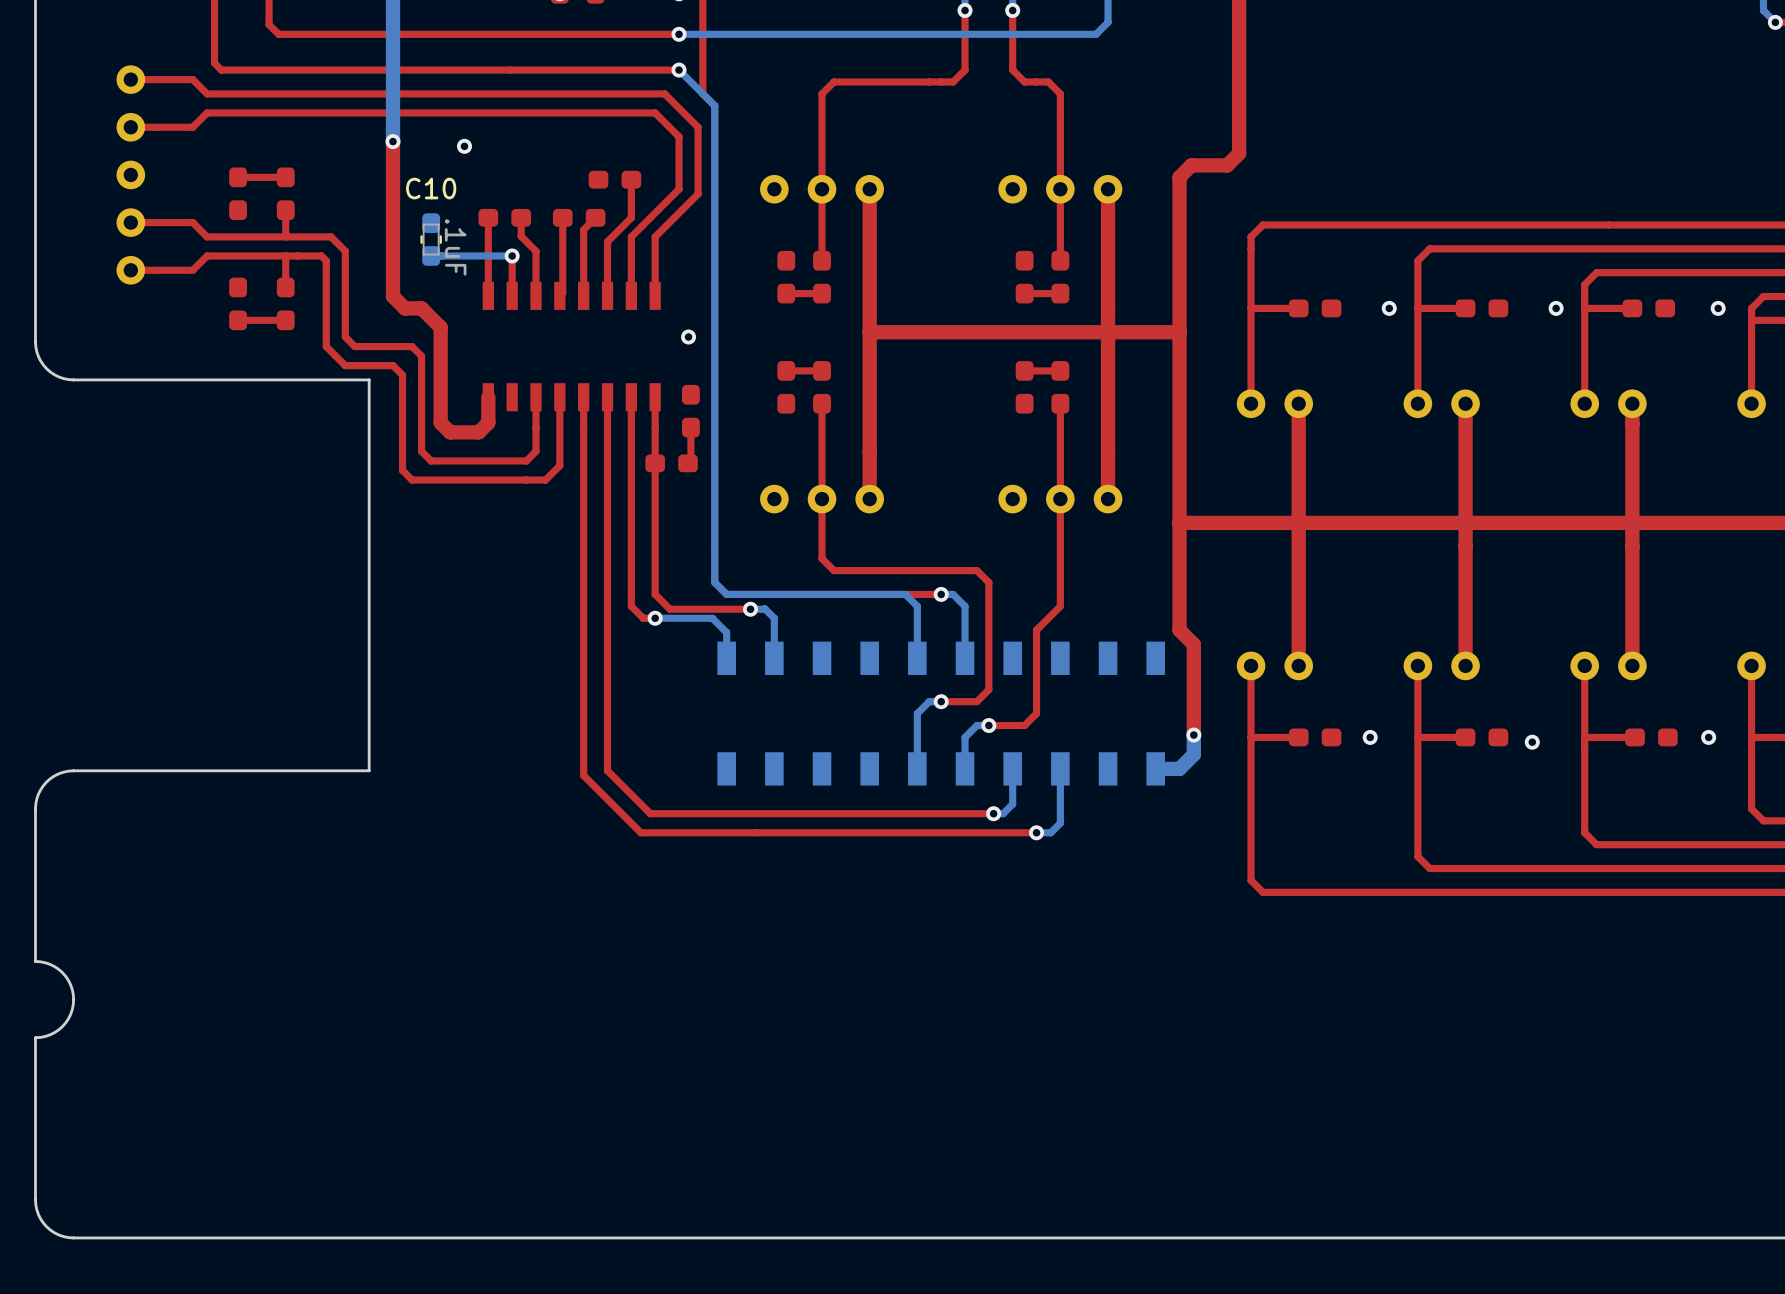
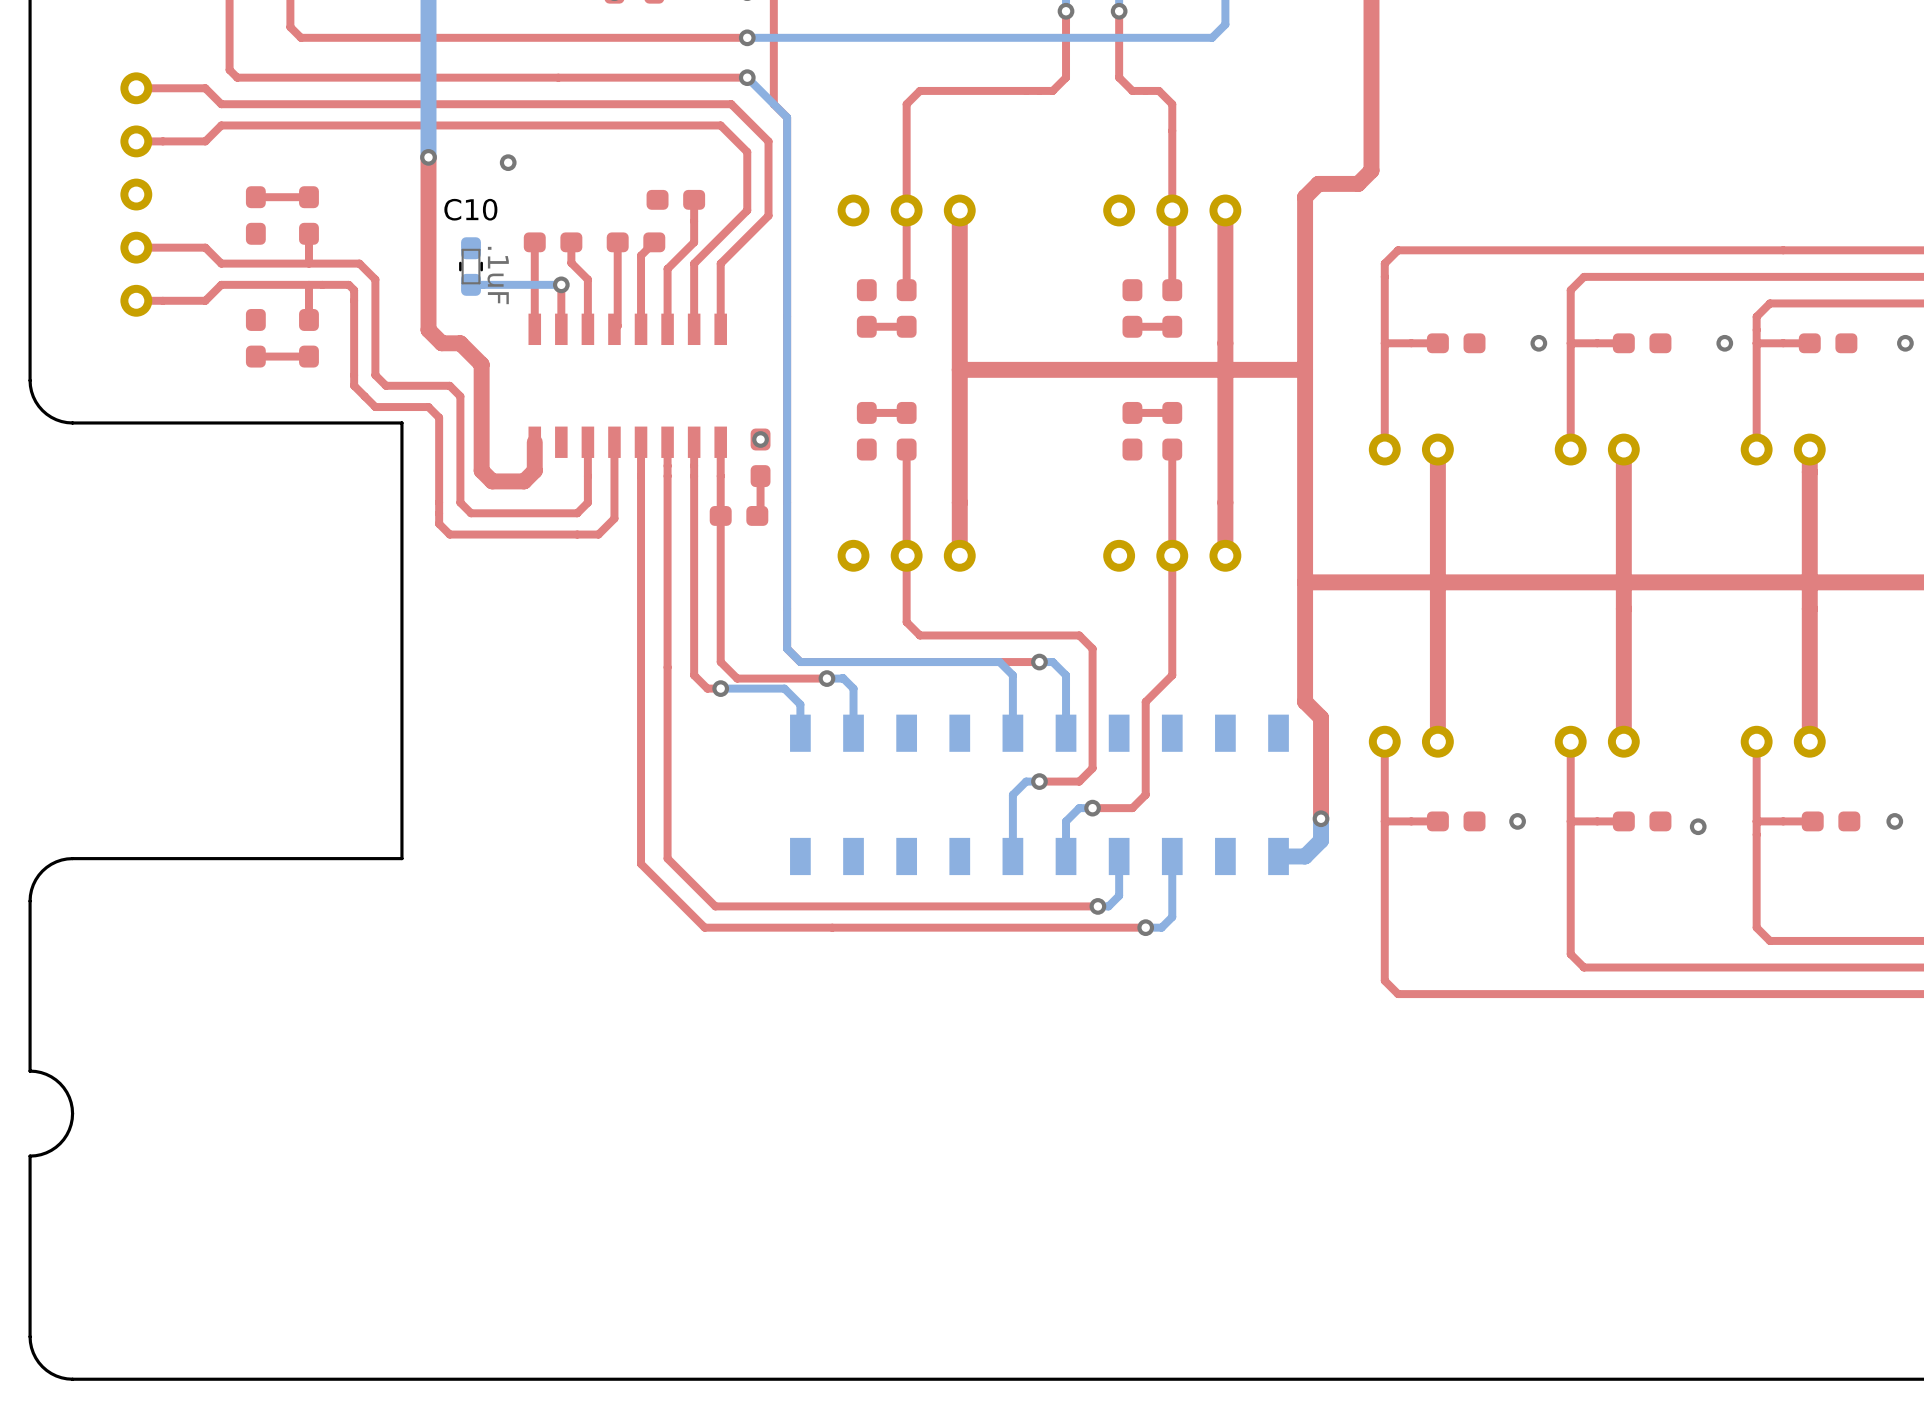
via position: (688, 337) -> (760, 439)

